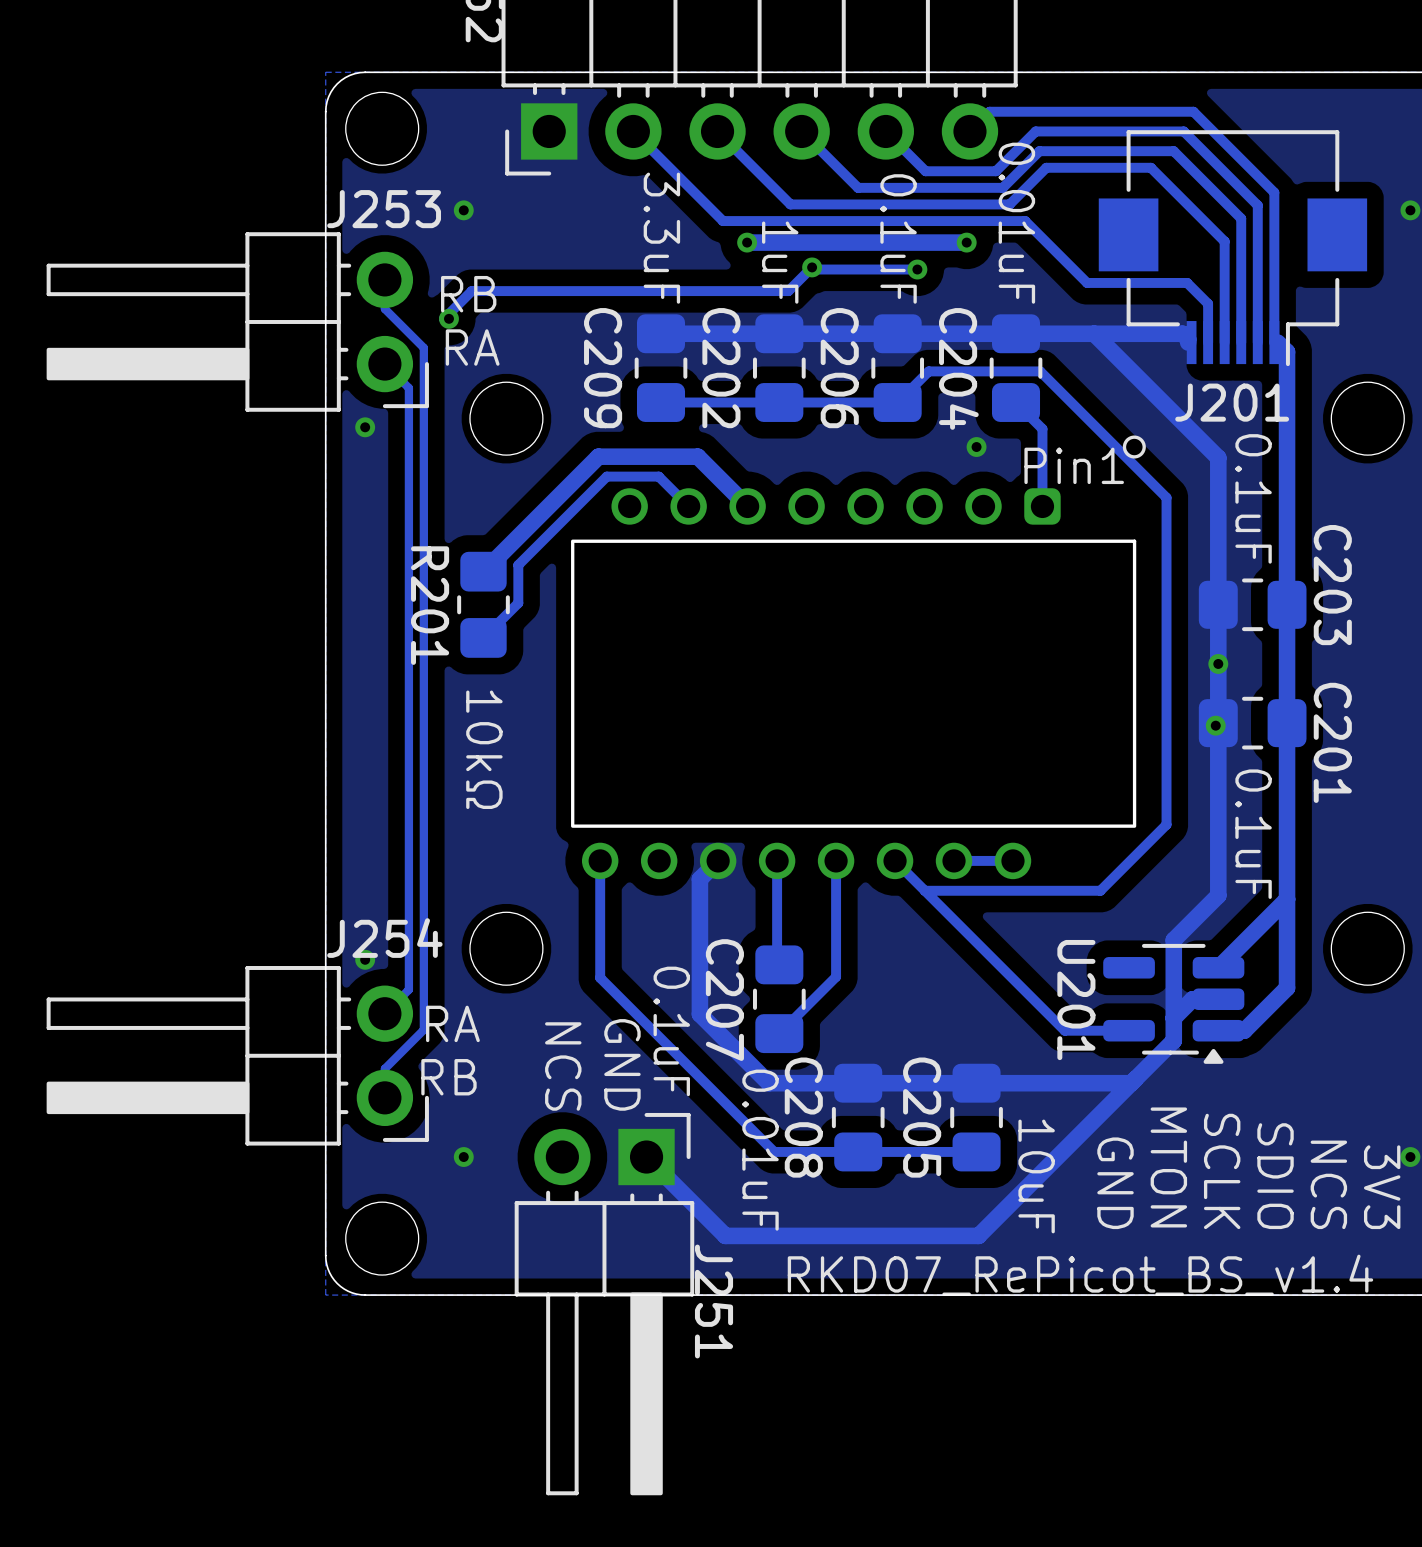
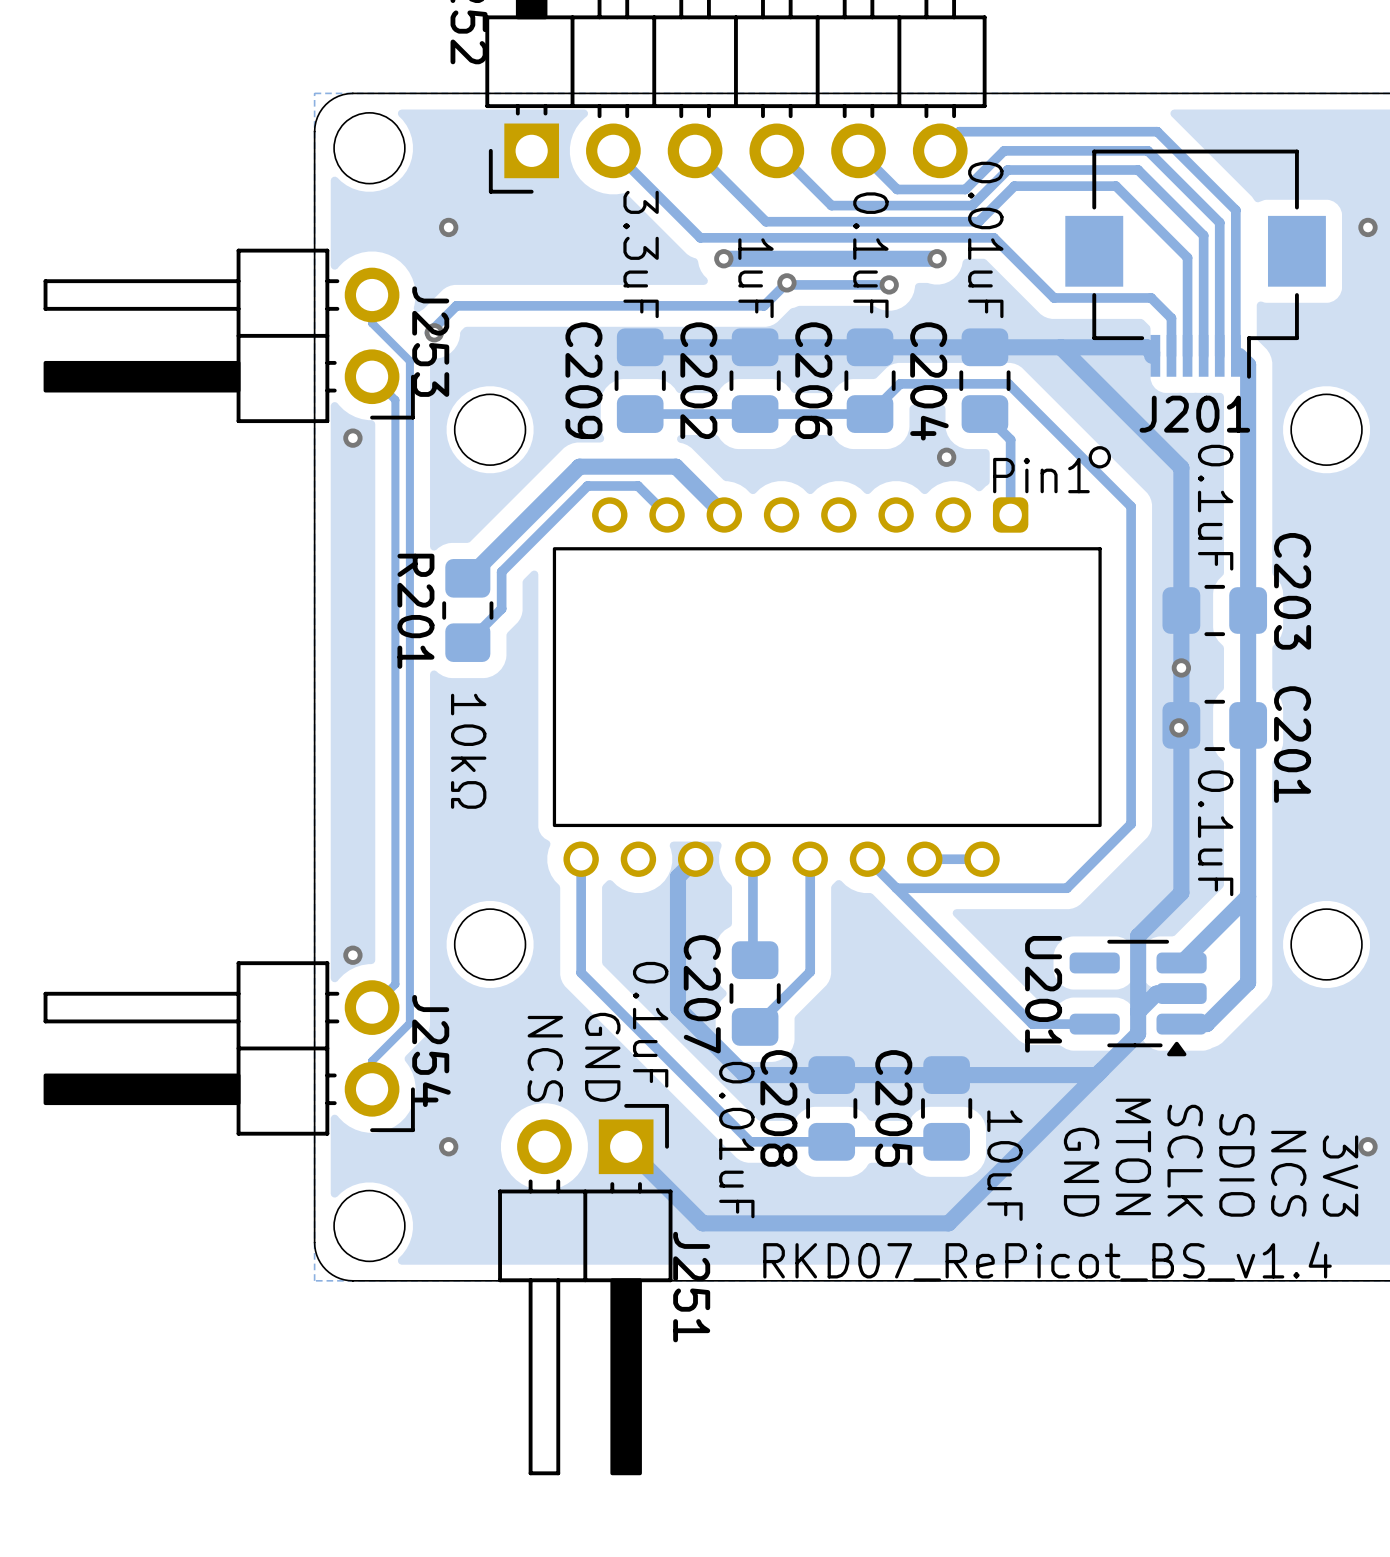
J253 name rotation: 0° (384, 209) -> 90° clockwise (430, 341)
text: RB (468, 294) -> none
text: RA (472, 347) -> none
J254 name rotation: 0° (384, 938) -> 90° clockwise (431, 1051)
text: RA (452, 1023) -> none
text: RB (448, 1077) -> none

